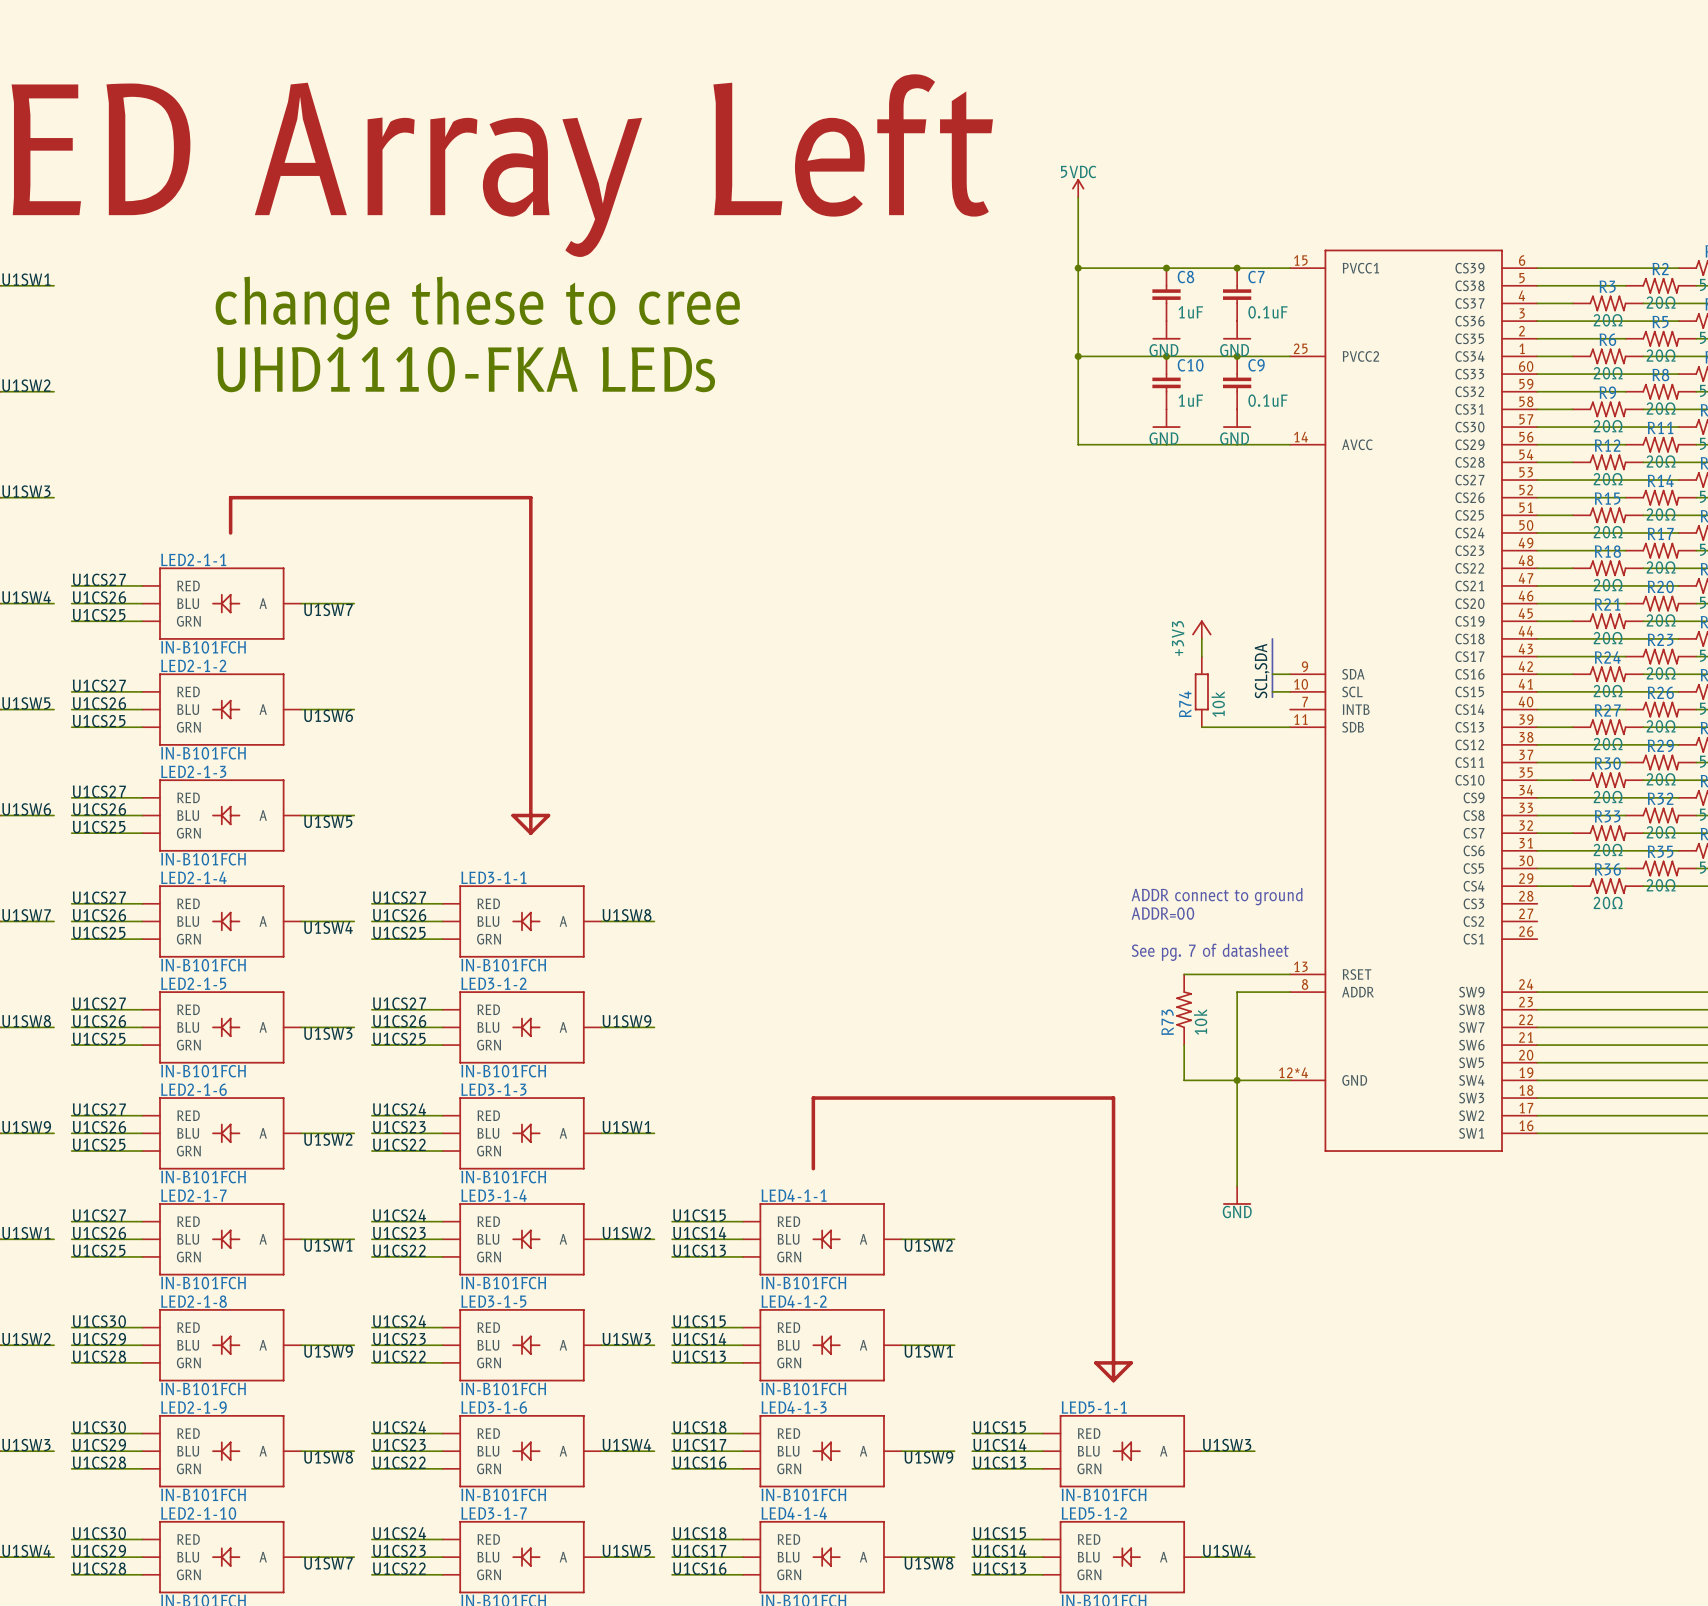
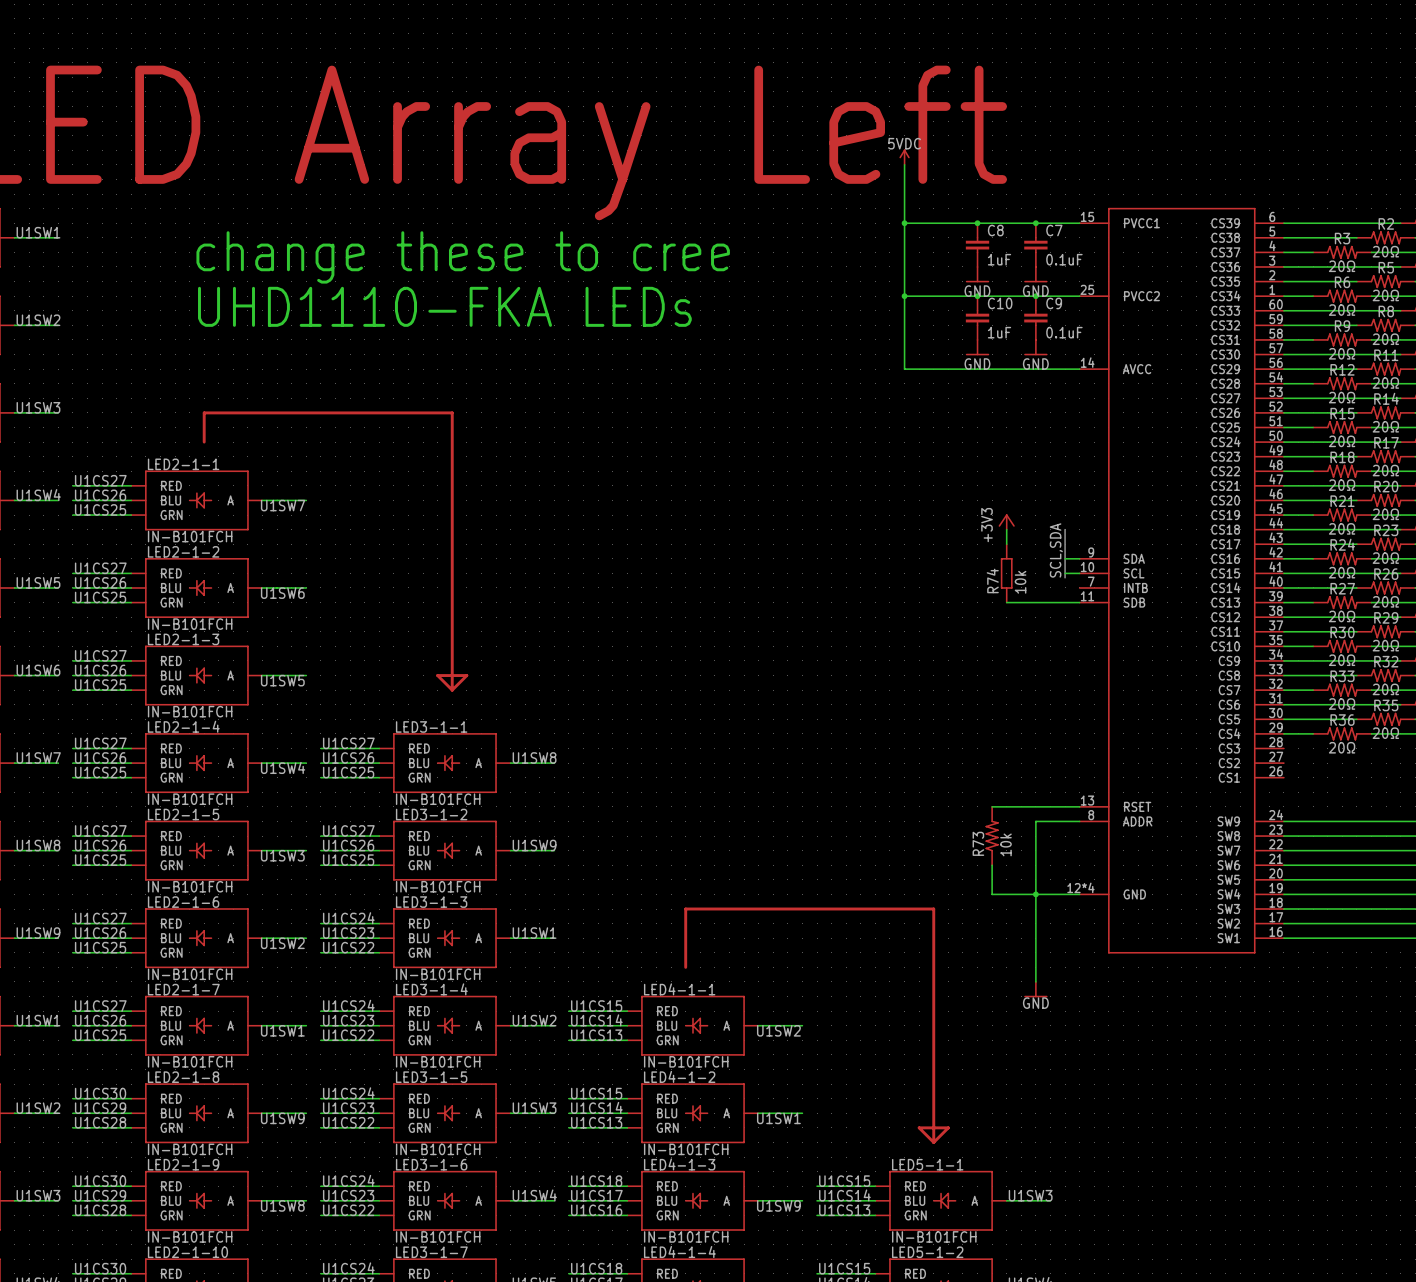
text: ADDR connect to ground (1217, 896) -> none
text: ADDR=00 (1162, 913) -> none
text: See pg. 7 of datasheet (1210, 952) -> none

